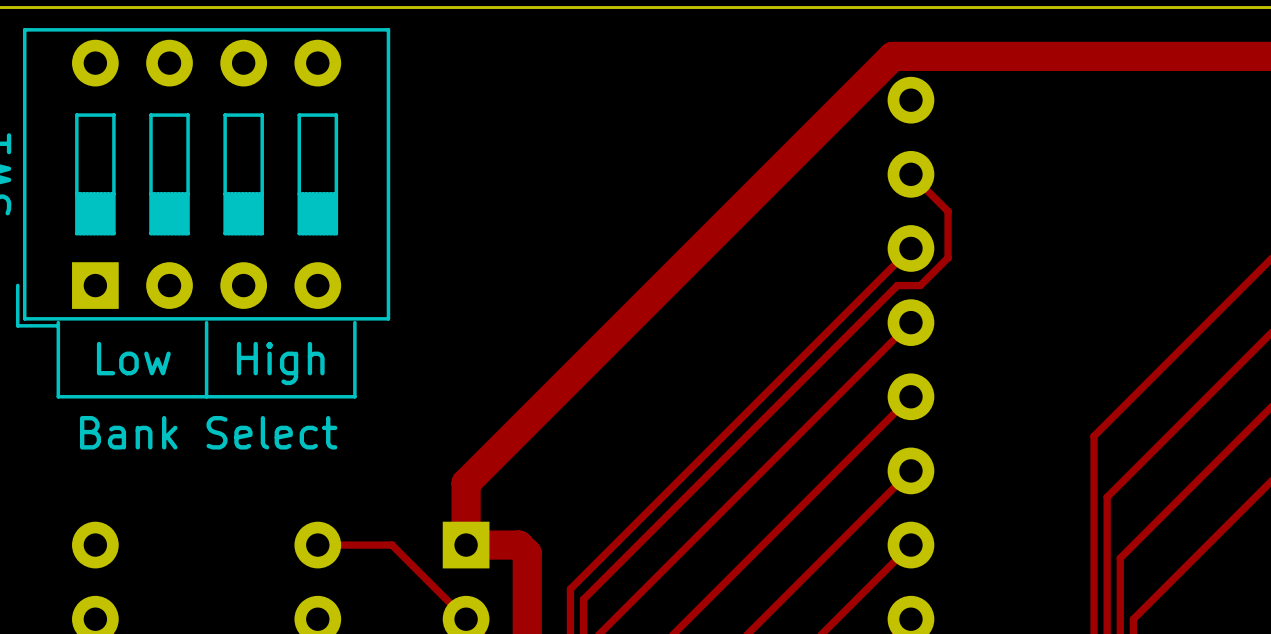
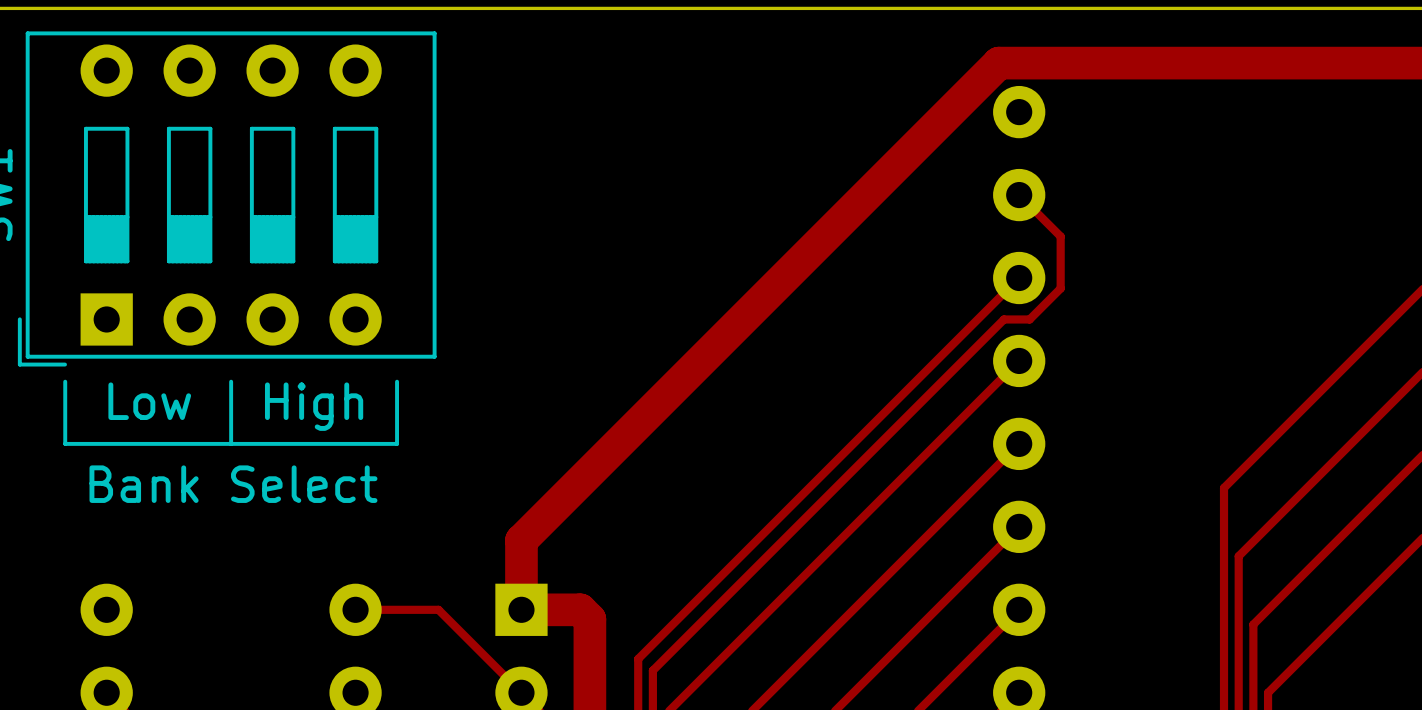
line: (58, 322) (58, 341) -> none
line: (206, 322) (206, 341) -> none
line: (354, 322) (354, 341) -> none

